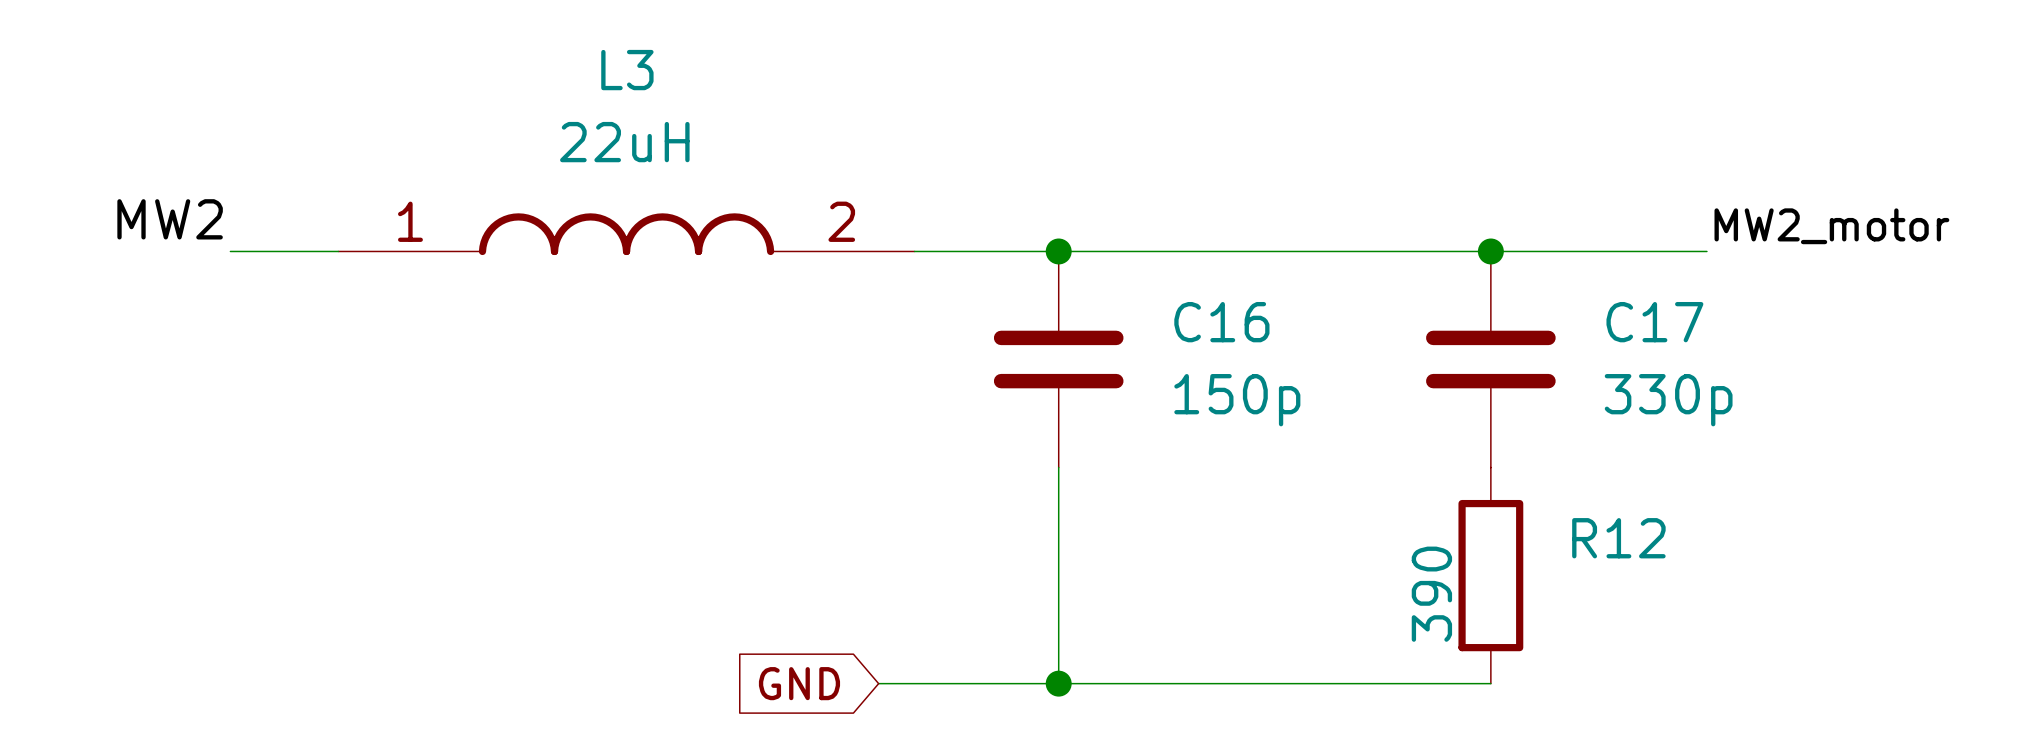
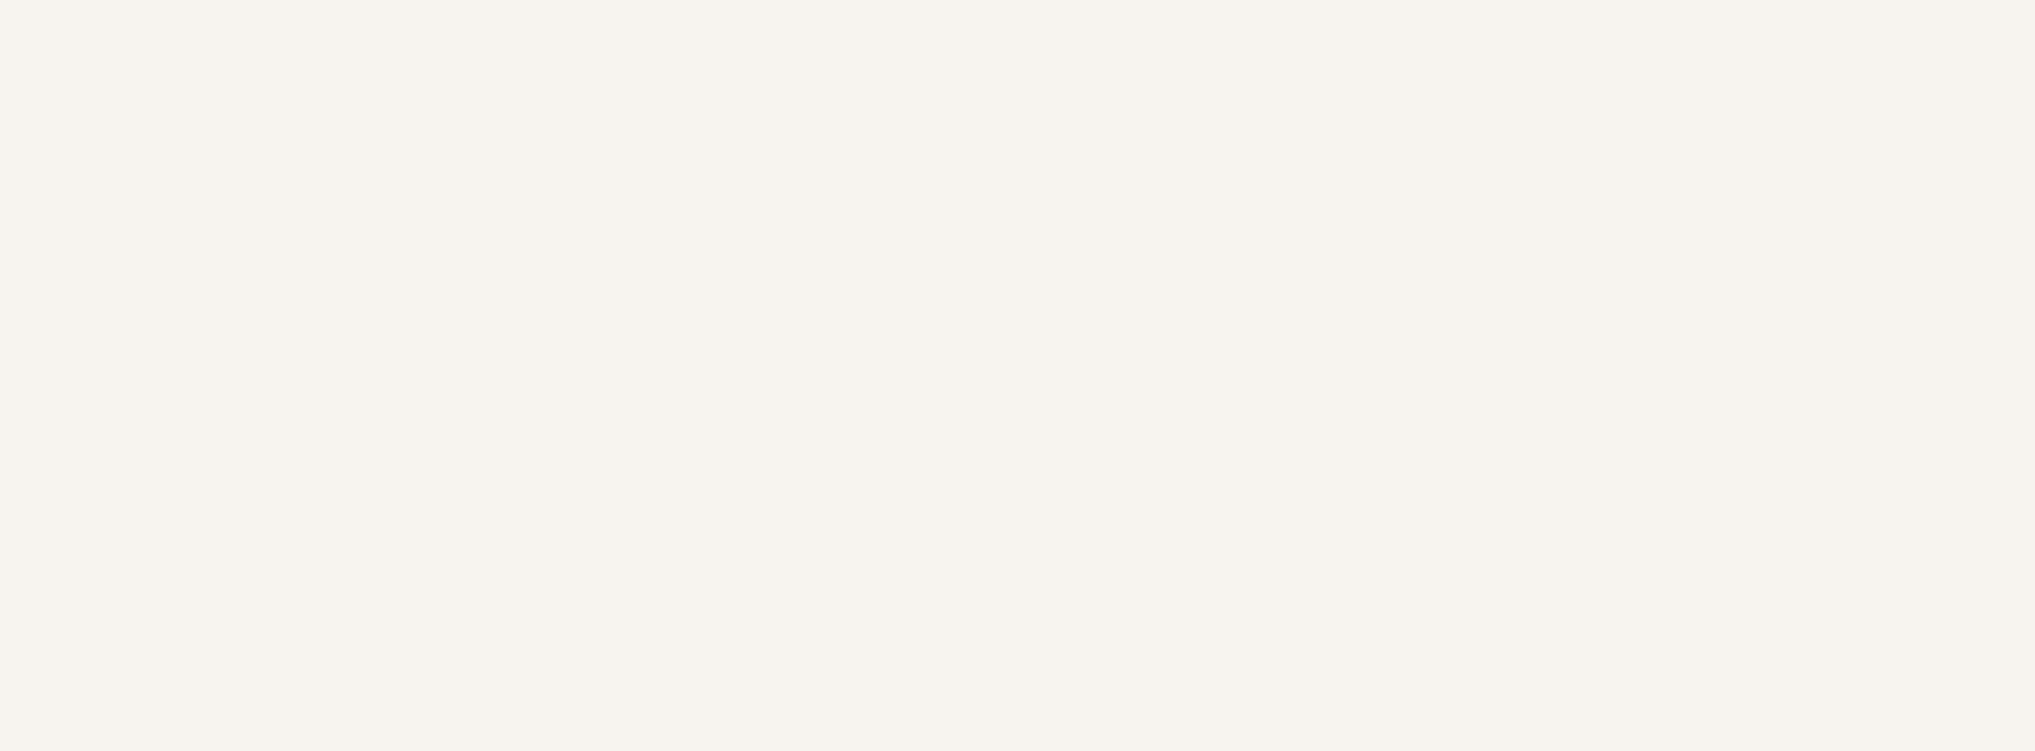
label: MW2 (170, 219) -> none
label: MW2_motor (1831, 226) -> none
L3: 22uH (626, 234) -> none
wire: (230, 251) (338, 251) -> none
wire: (914, 251) (1706, 251) -> none
junction: (1058, 251) -> none
junction: (1490, 251) -> none
C16: 150p (1058, 359) -> none
C17: 330p (1490, 359) -> none
wire: (1058, 467) (1058, 683) -> none
R12: 390 (1490, 575) -> none
global label: GND (799, 683) -> none
wire: (878, 683) (1490, 683) -> none
junction: (1058, 683) -> none

